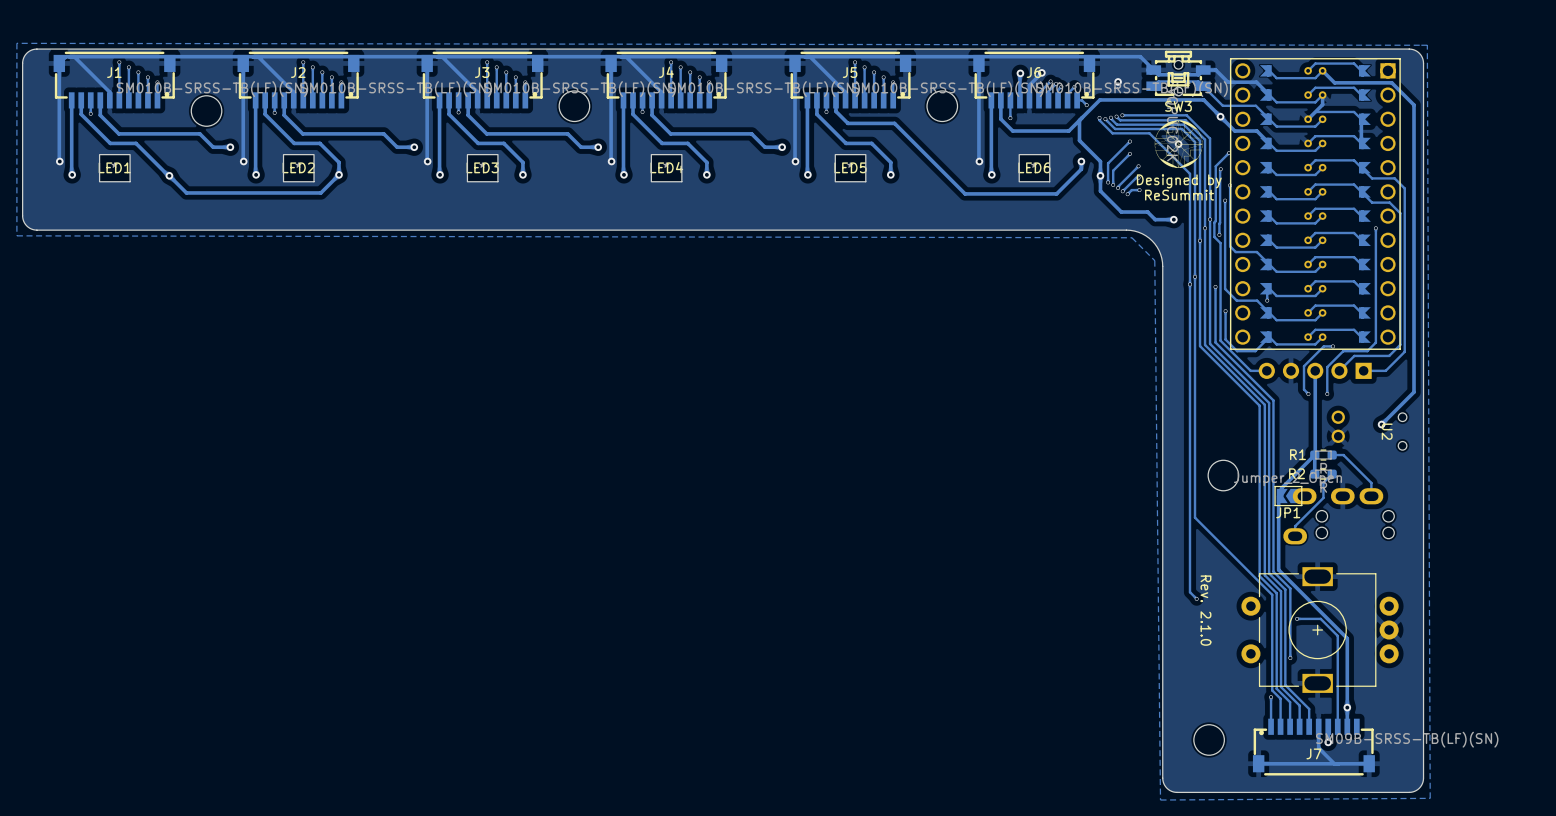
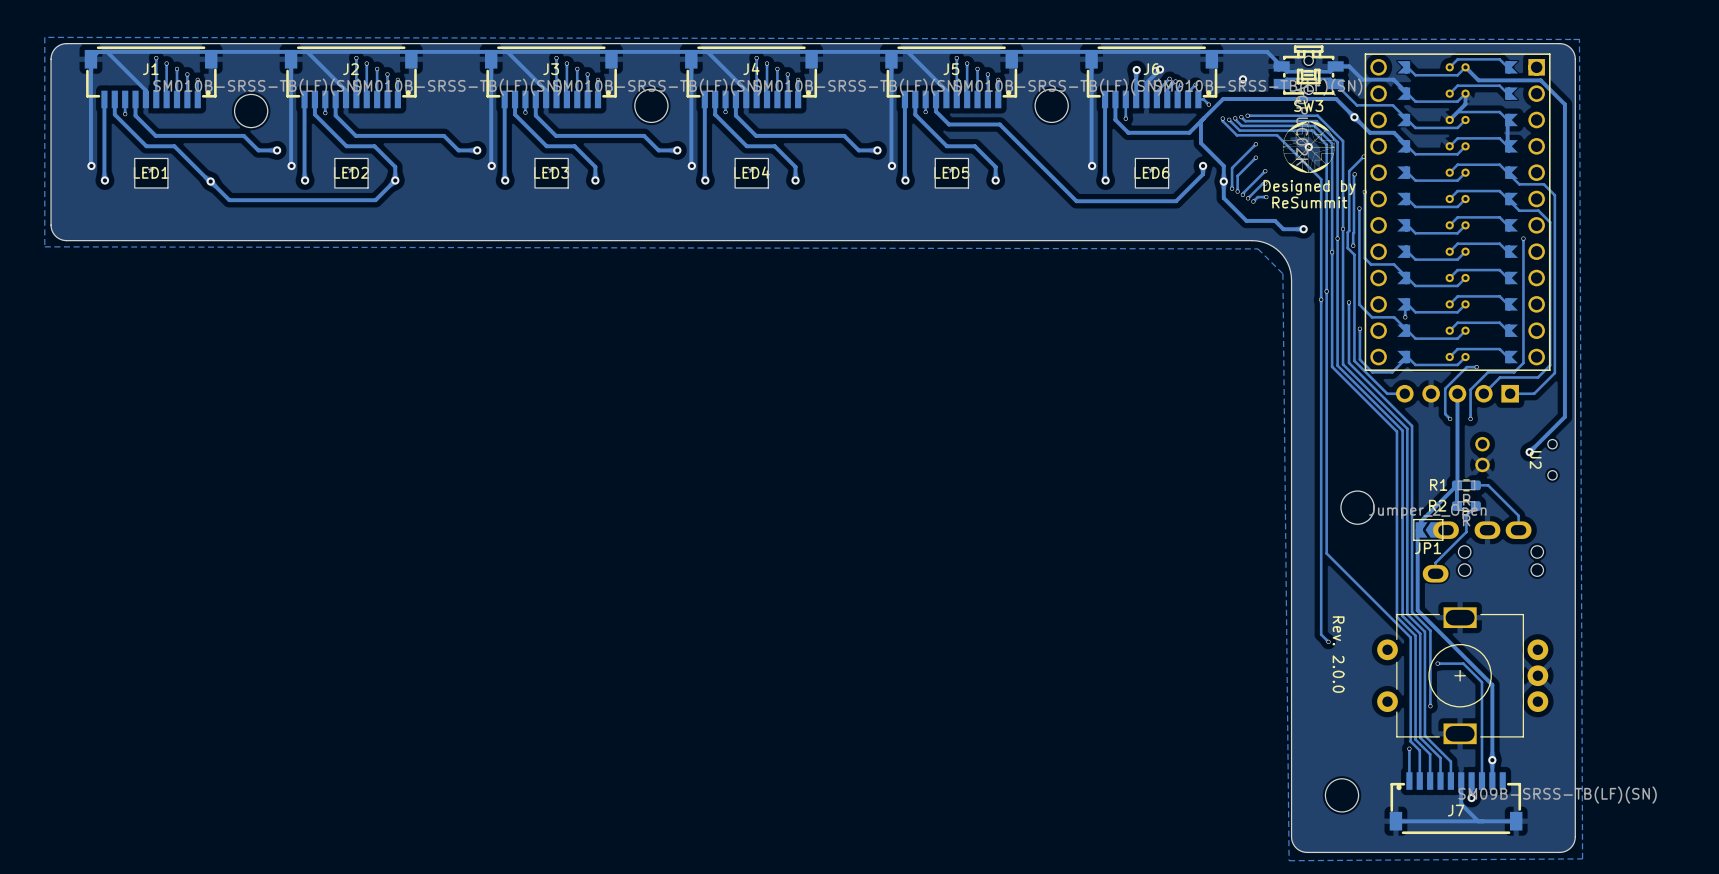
text: Rev. 2.1.0 (1205, 610) -> Rev. 2.0.0 (1338, 654)

